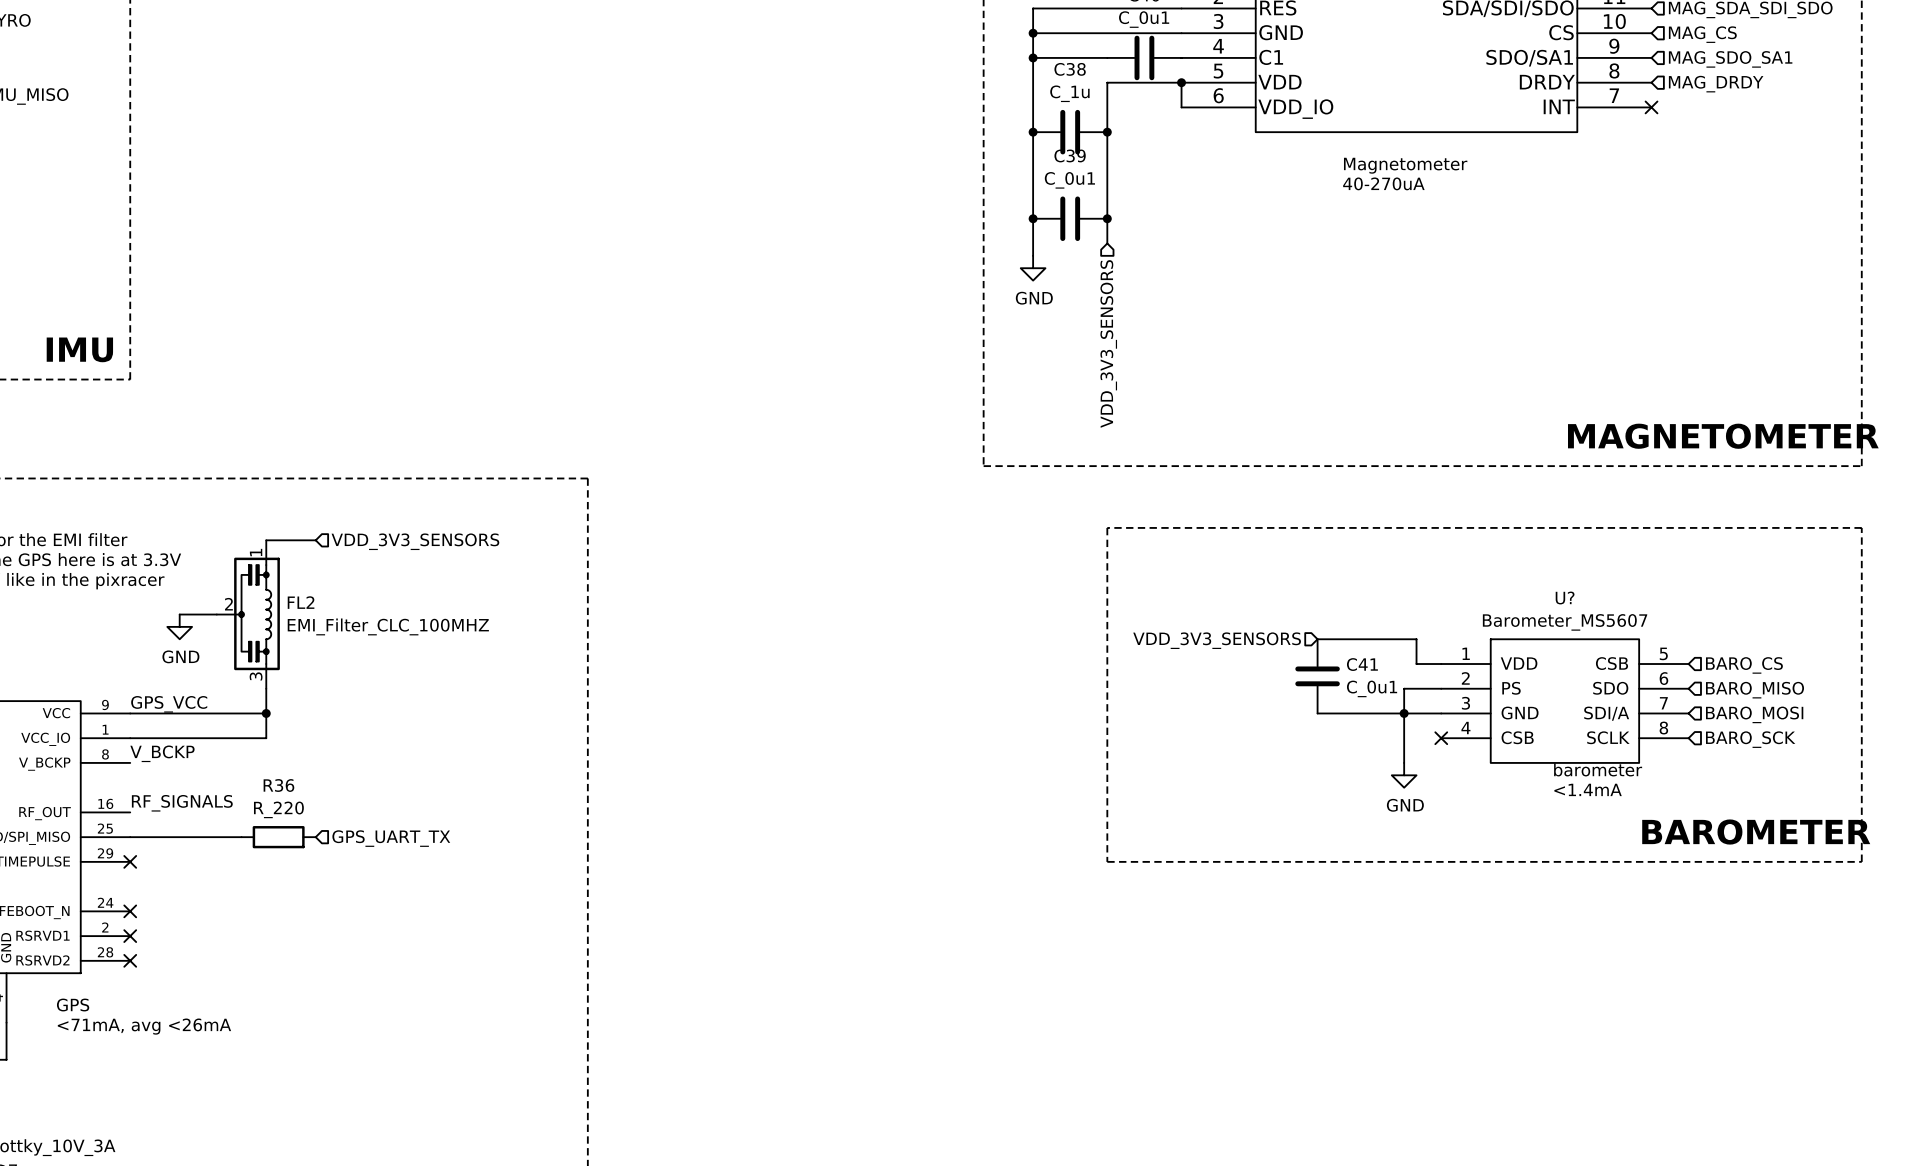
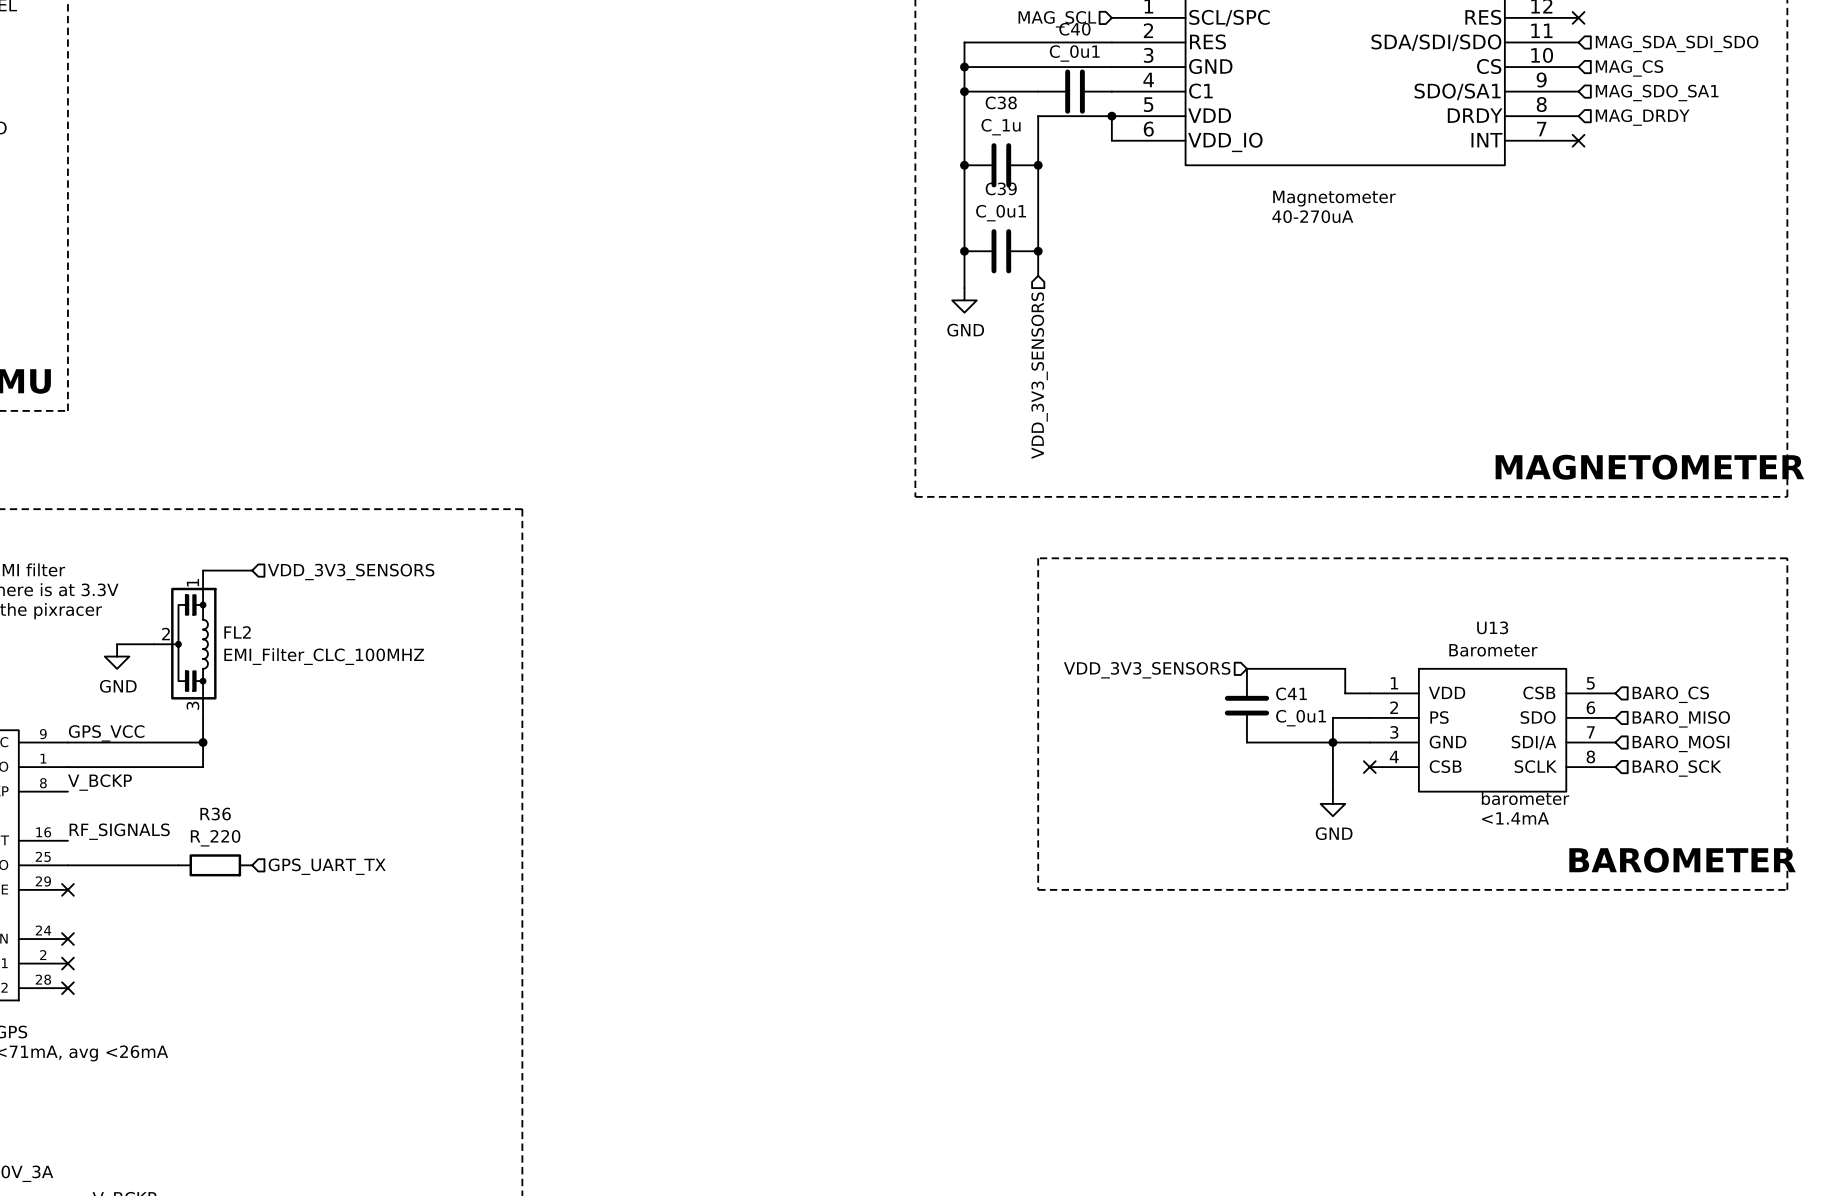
U? name: U? (1565, 598) -> U13 (1492, 627)
U? value: Barometer_MS5607 (1565, 622) -> Barometer (1493, 650)

